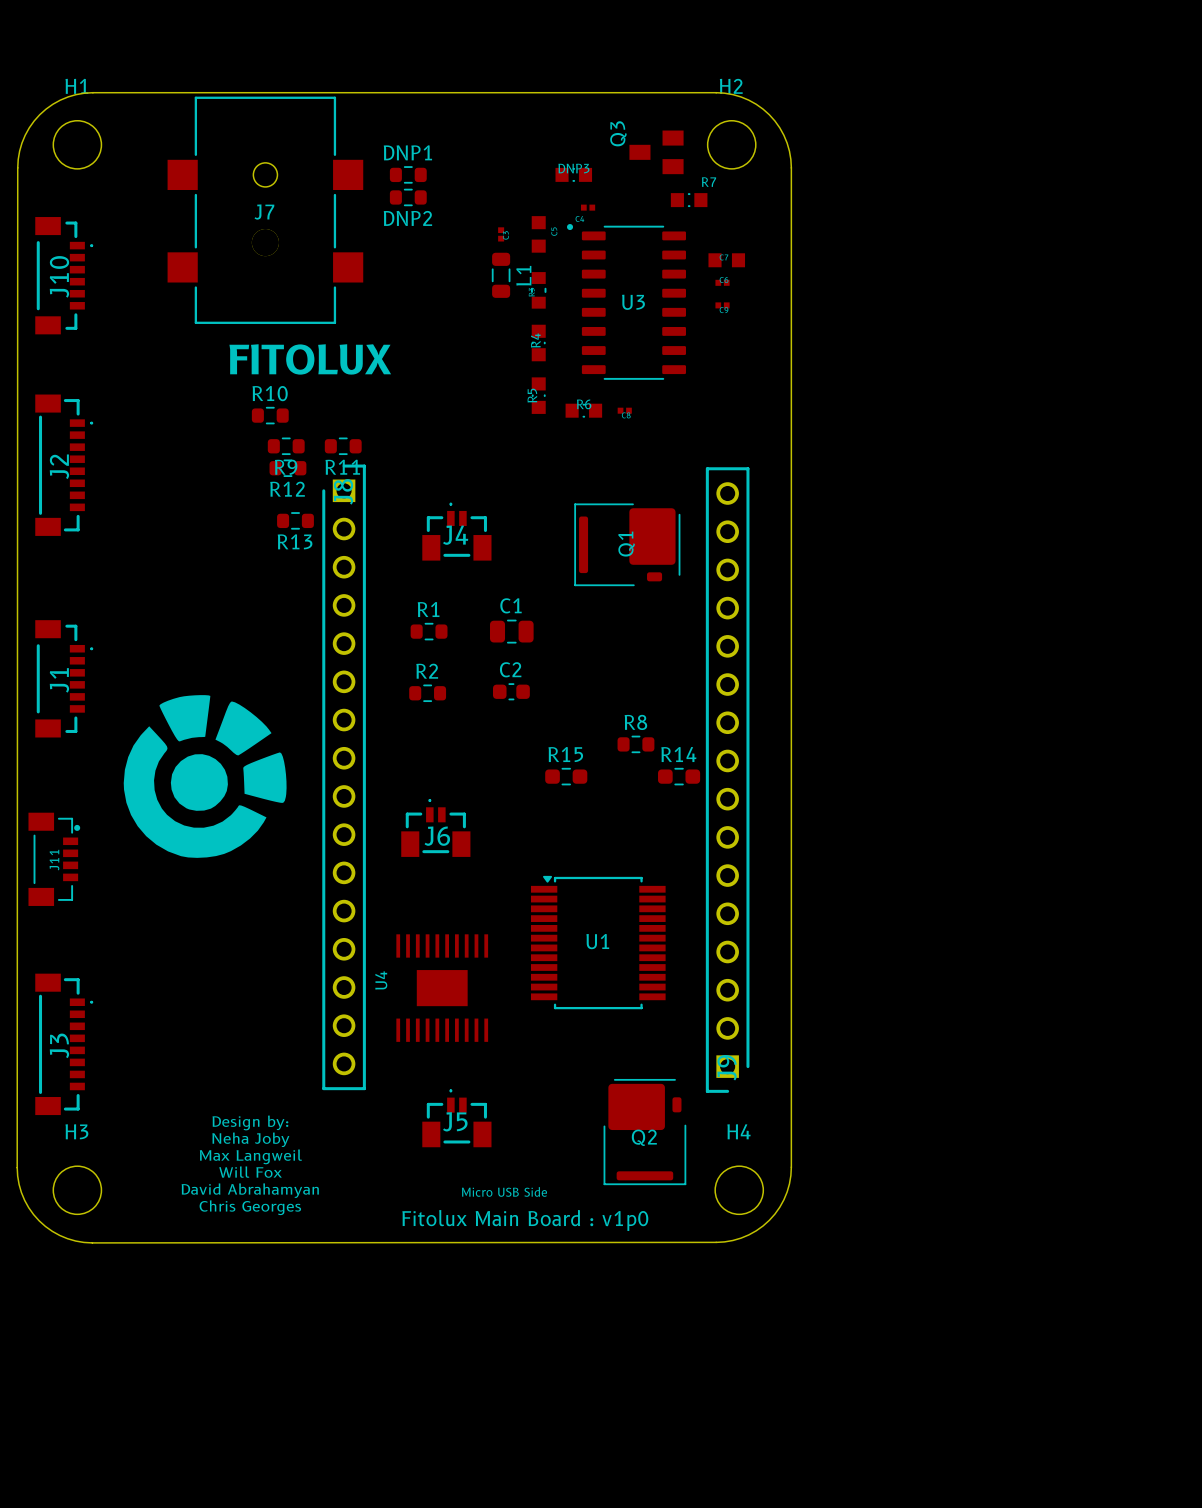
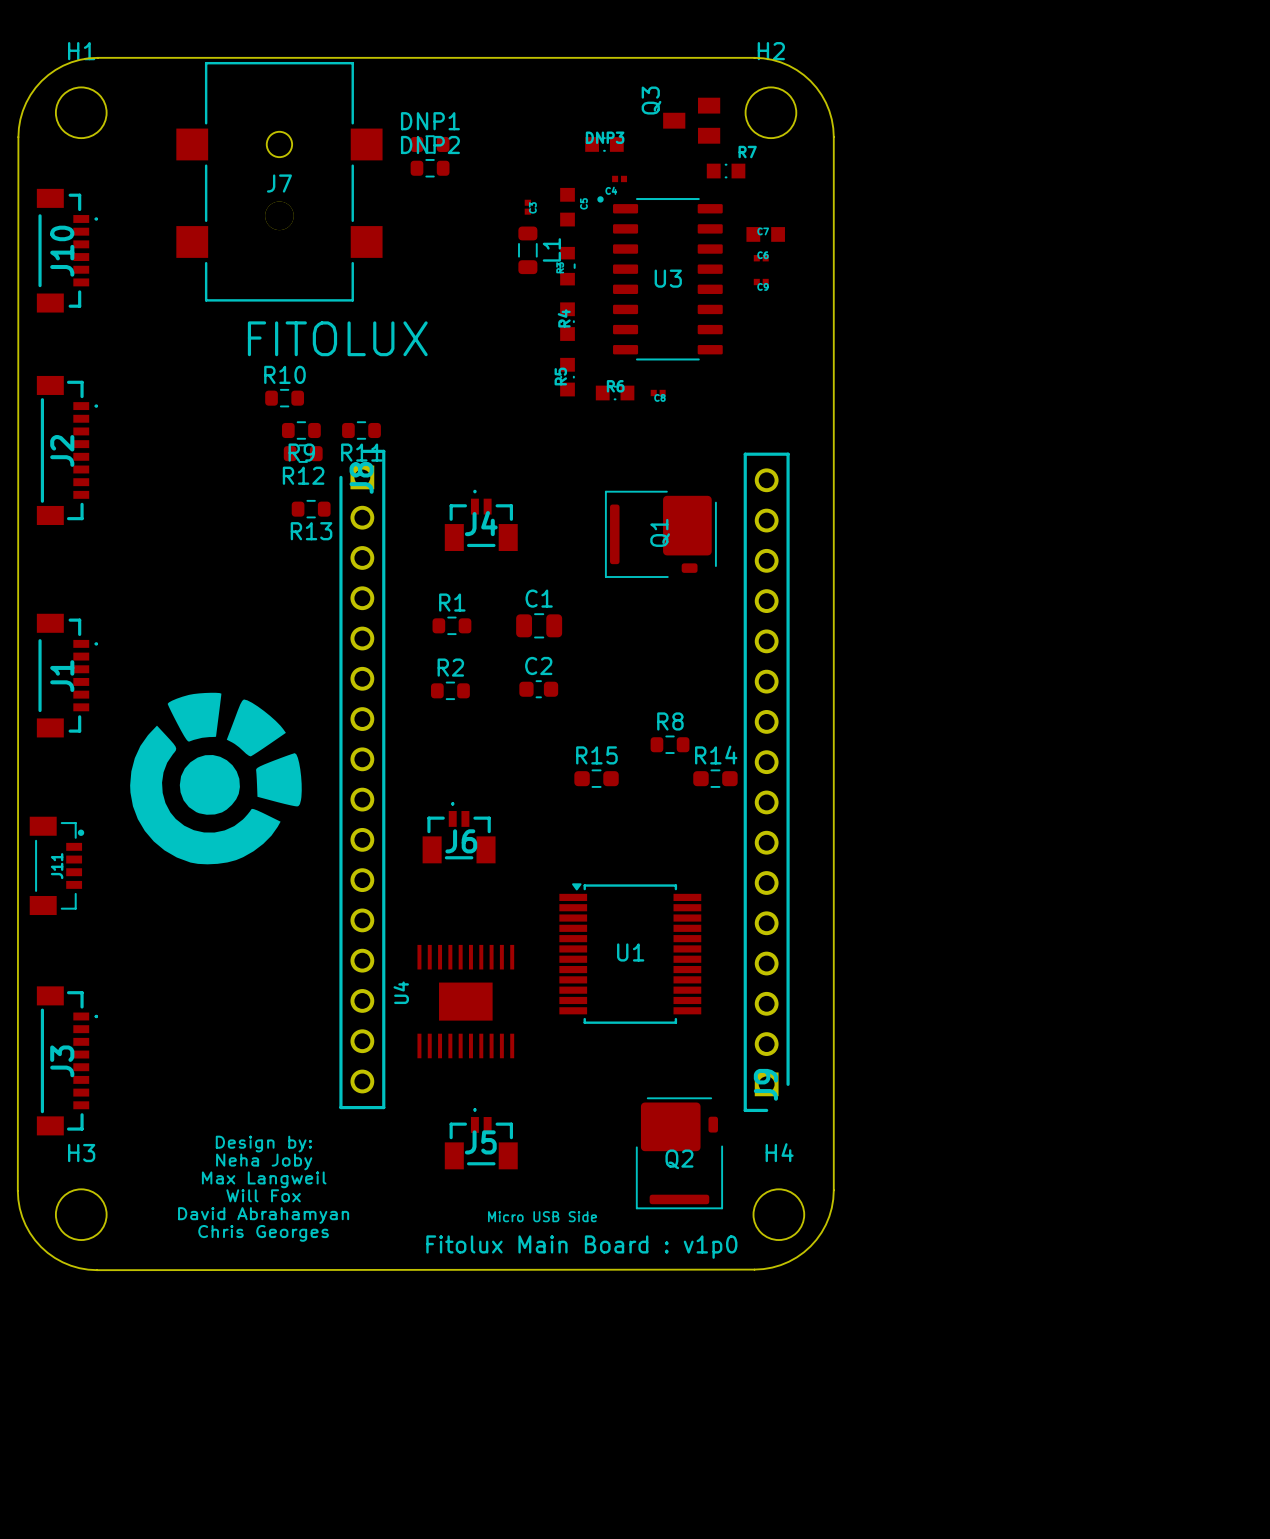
DNP2 name position: DNP2 (407, 218) -> DNP2 (430, 144)

